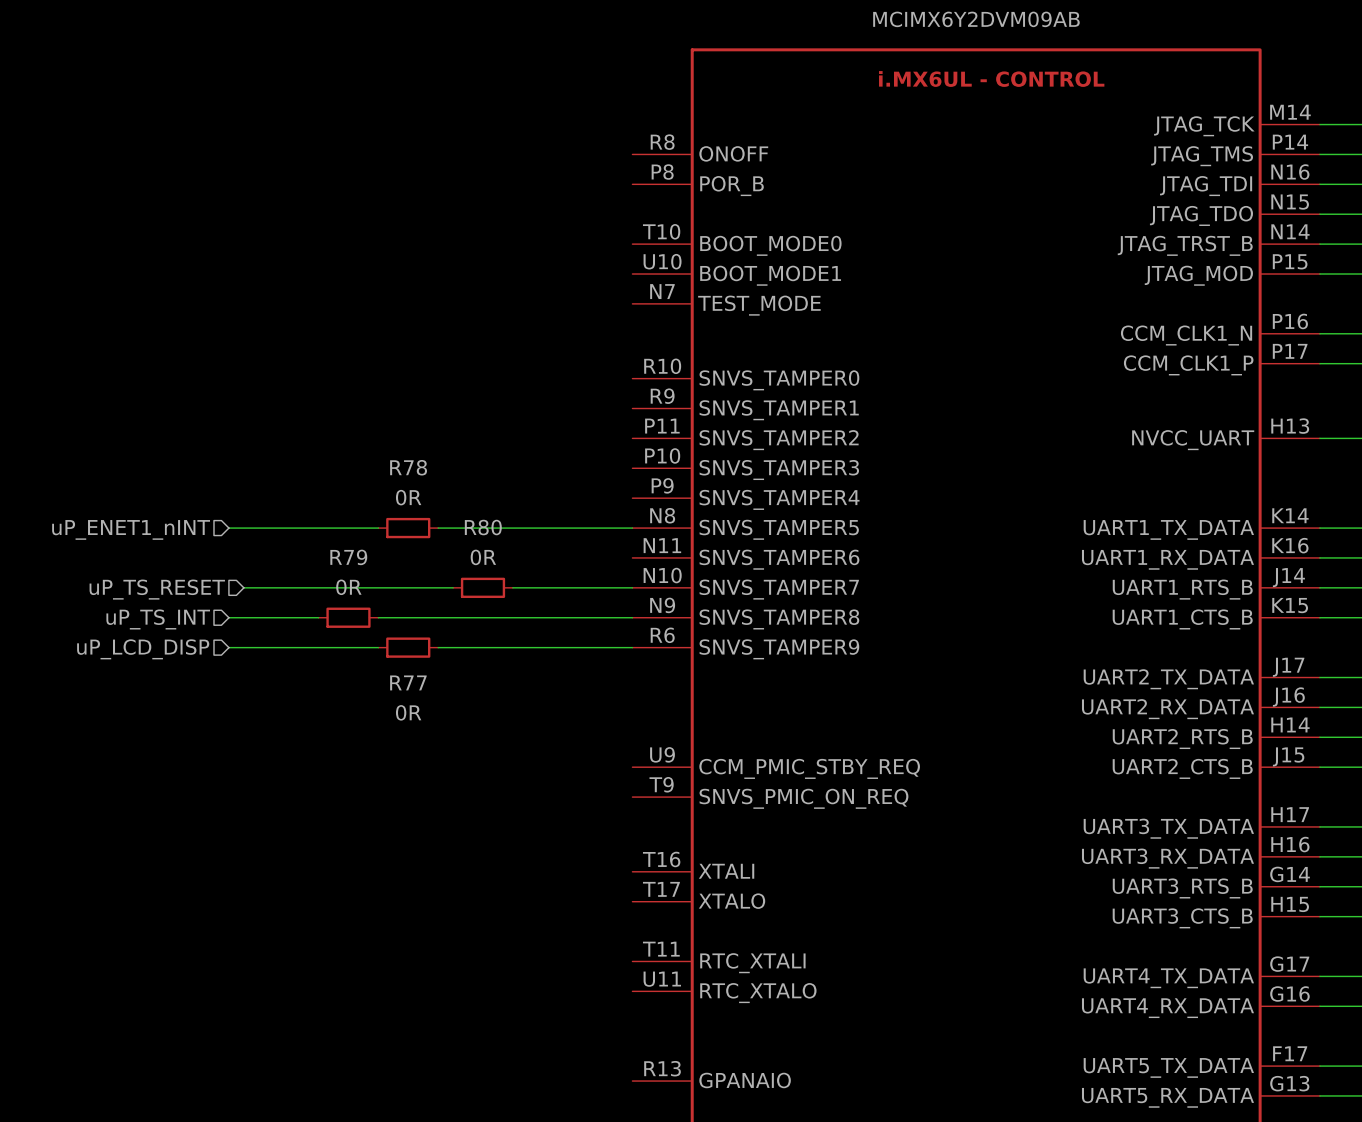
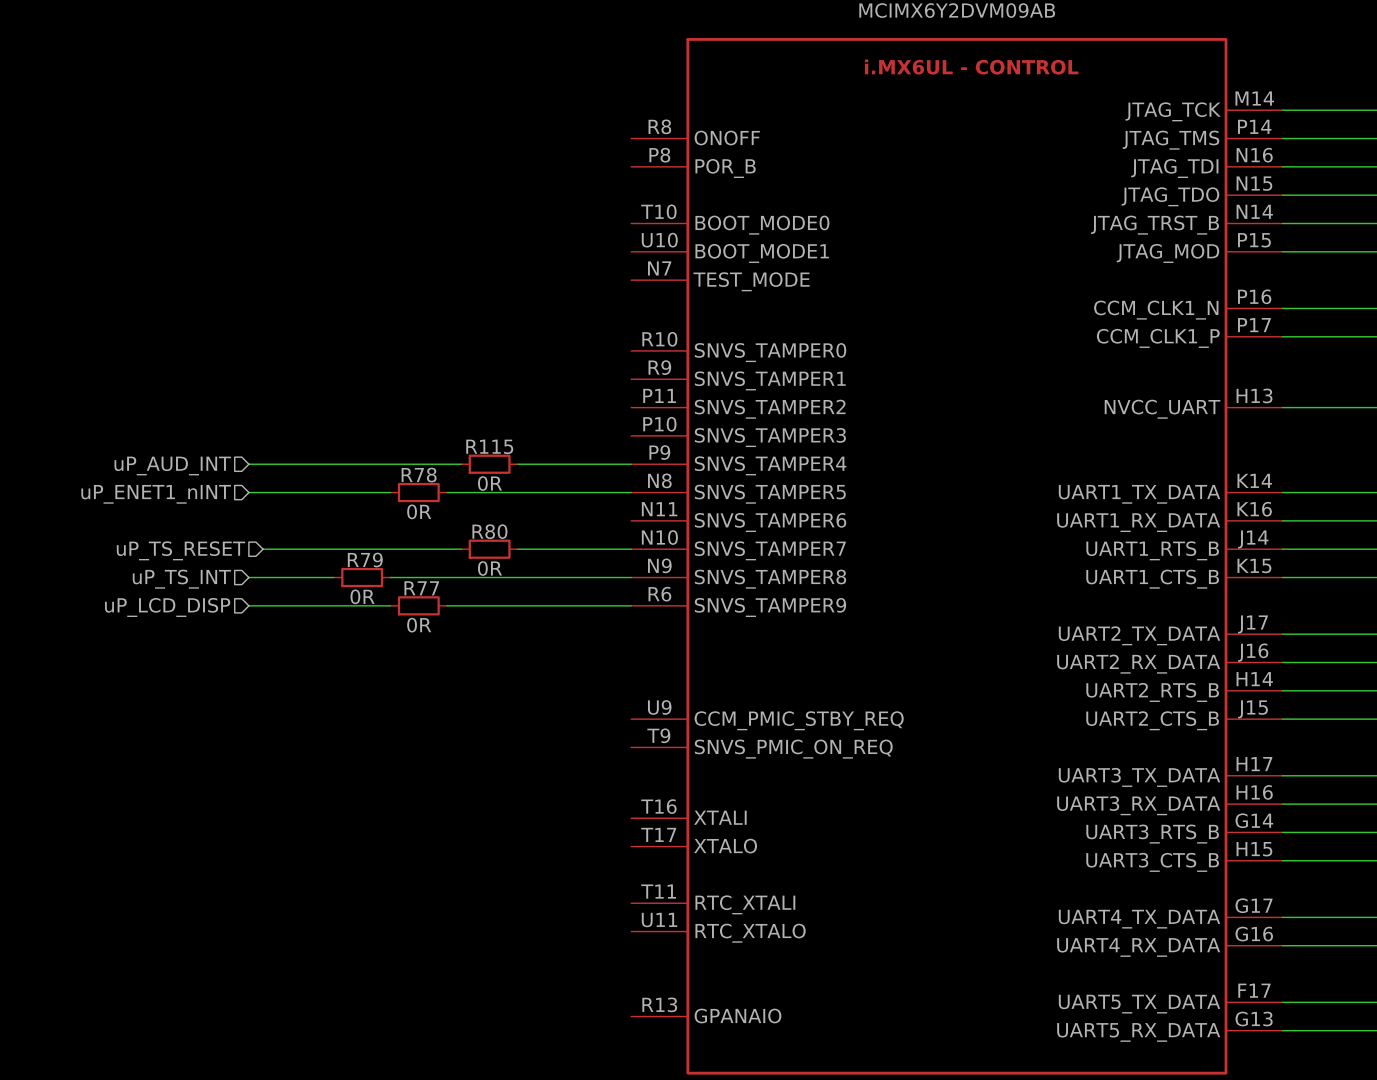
R78 name position: R78 (408, 467) -> R78 (419, 475)
R78 value position: 0R (408, 497) -> 0R (419, 511)
wire: none -> (248, 464) (461, 464)
R115: none -> 0R (489, 464)
wire: none -> (517, 464) (631, 464)
hierarchical label: none -> uP_AUD_INT (172, 466)
R80 name position: R80 (483, 527) -> R80 (489, 531)
R79 name position: R79 (348, 557) -> R79 (365, 560)
R80 value position: 0R (483, 557) -> 0R (489, 568)
R79 value position: 0R (348, 587) -> 0R (362, 596)
R77 name position: R77 (408, 682) -> R77 (421, 588)
R77 value position: 0R (408, 712) -> 0R (419, 625)

